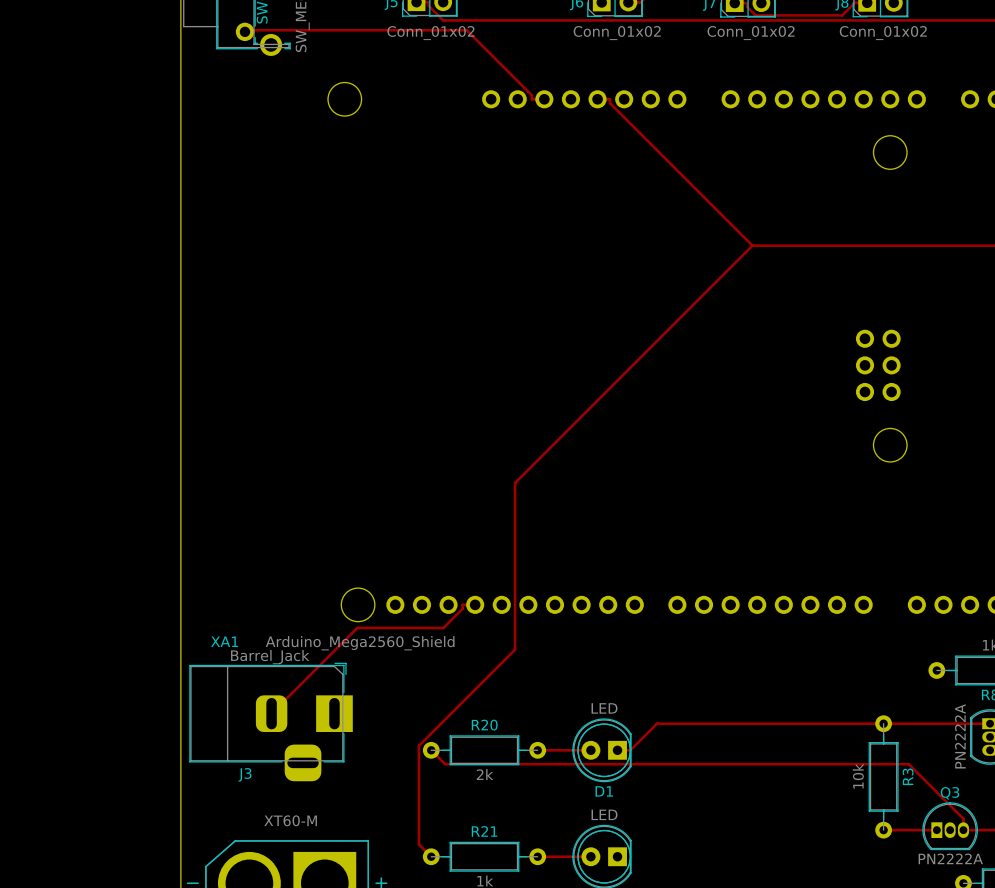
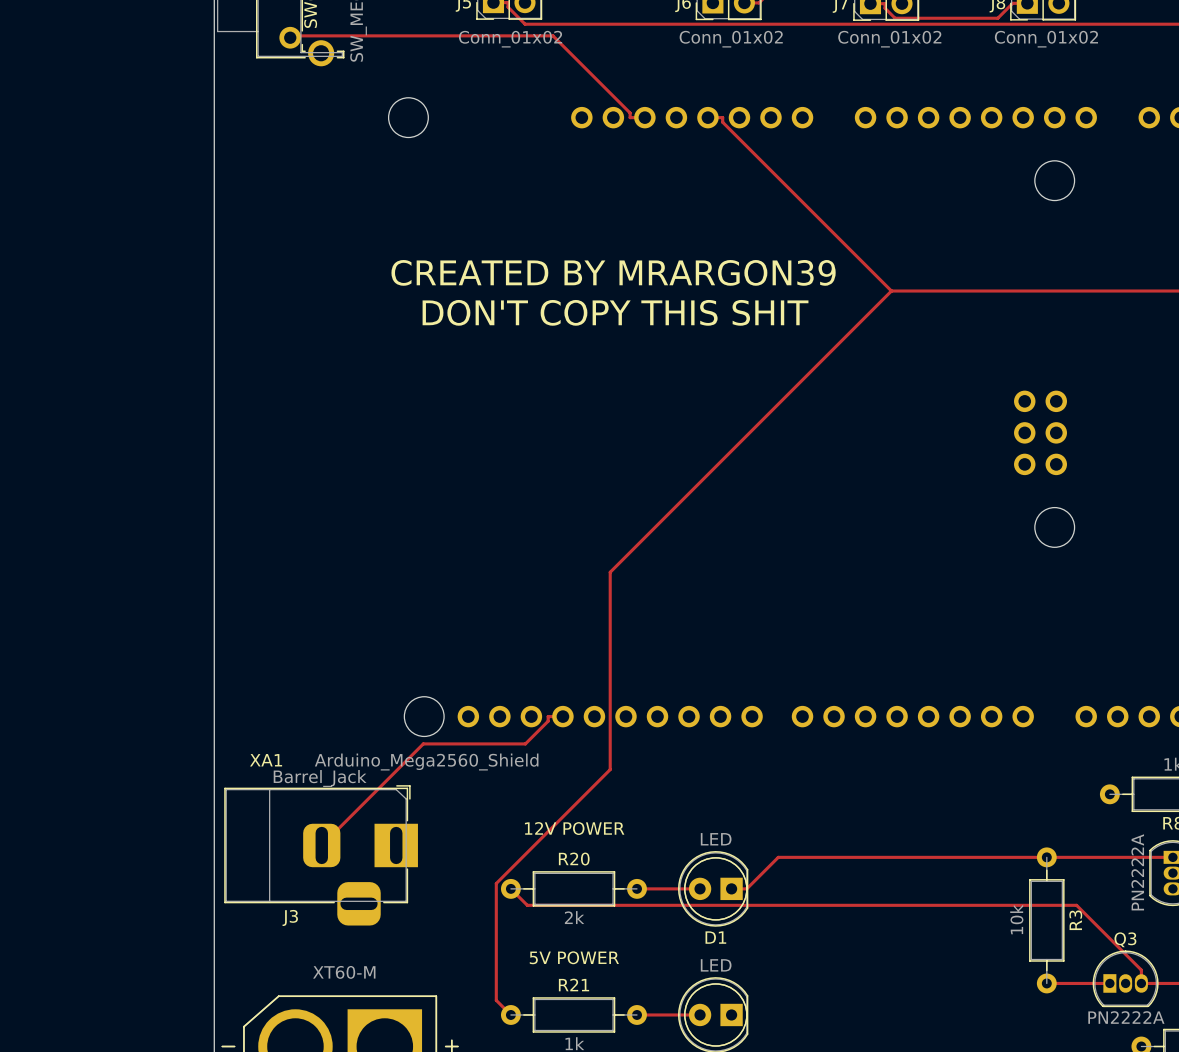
text: none -> CREATED BY MRARGON39 (613, 272)
text: none -> DON'T COPY THIS SHIT (615, 312)
text: none -> 12V POWER (574, 828)
text: none -> 5V POWER (574, 957)

